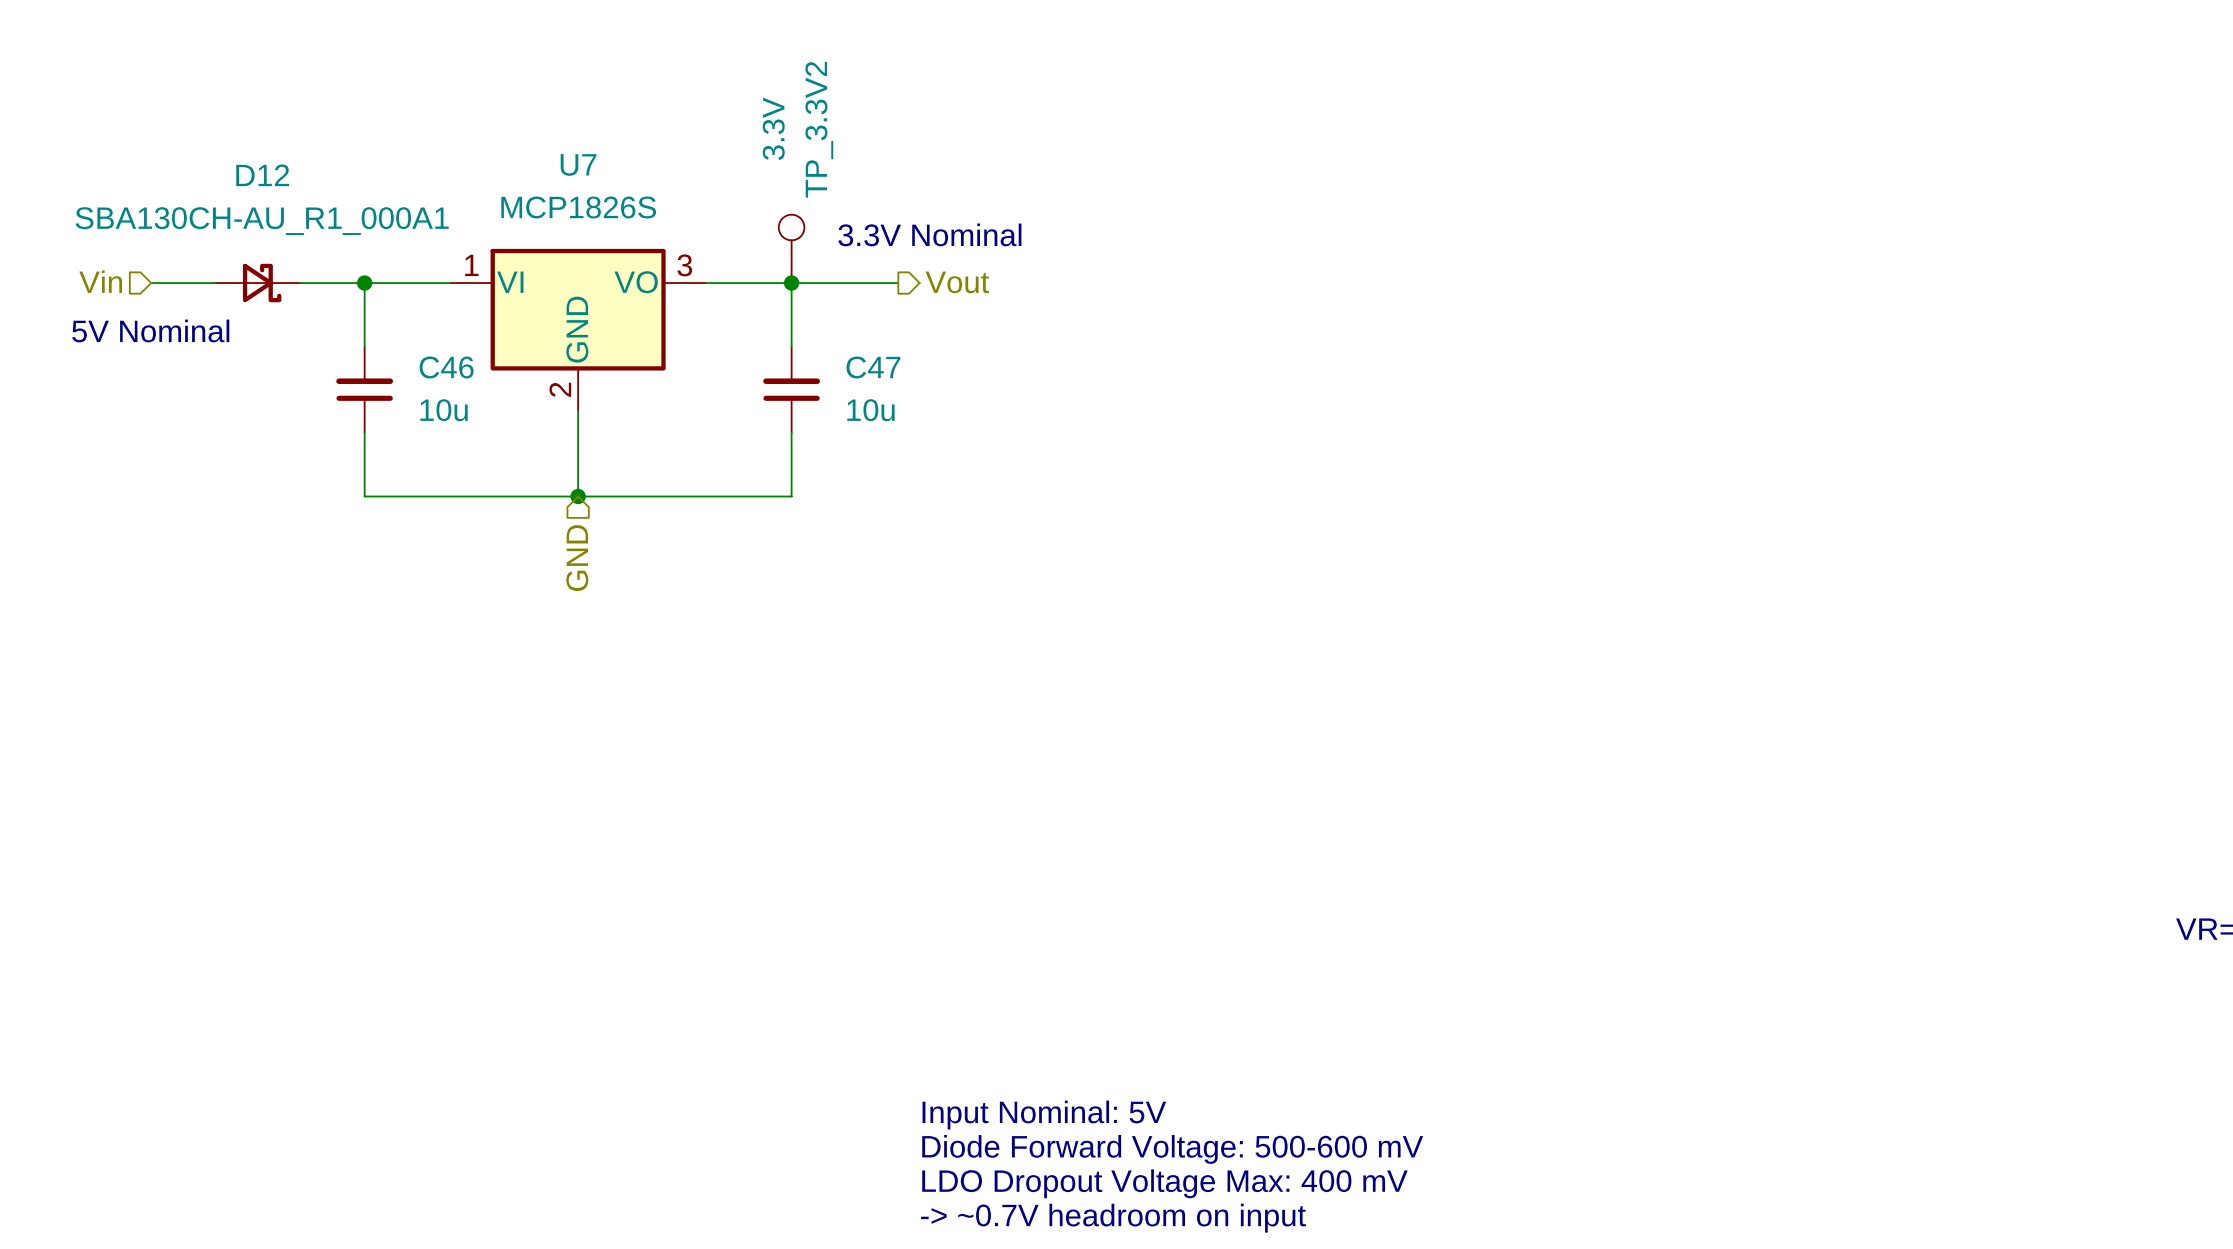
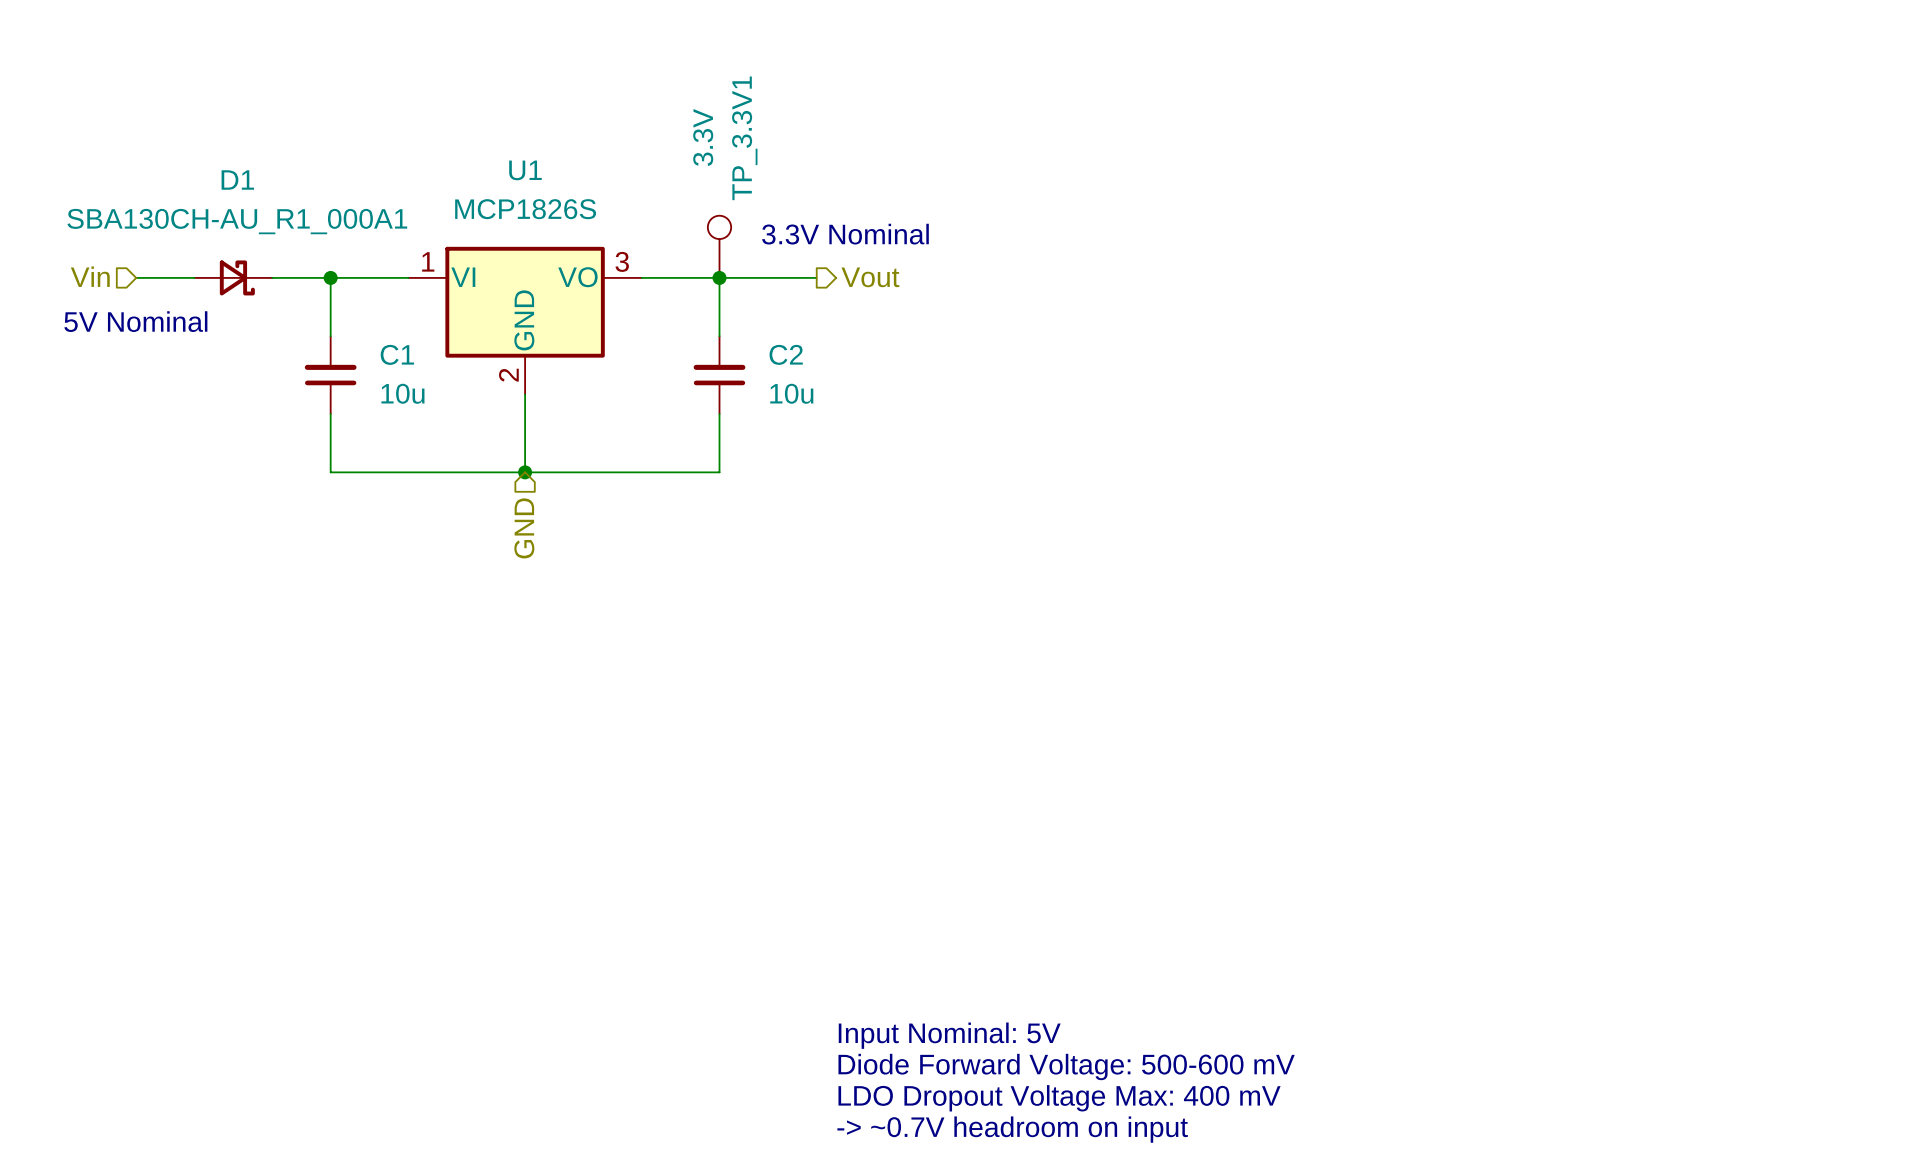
TP_3.3V2 name: TP_3.3V2 (819, 129) -> TP_3.3V1 (744, 138)
U7 name: U7 (578, 164) -> U1 (525, 170)
D12 name: D12 (262, 175) -> D1 (237, 180)
C46 name: C46 (446, 367) -> C1 (397, 354)
C47 name: C47 (873, 367) -> C2 (786, 354)

